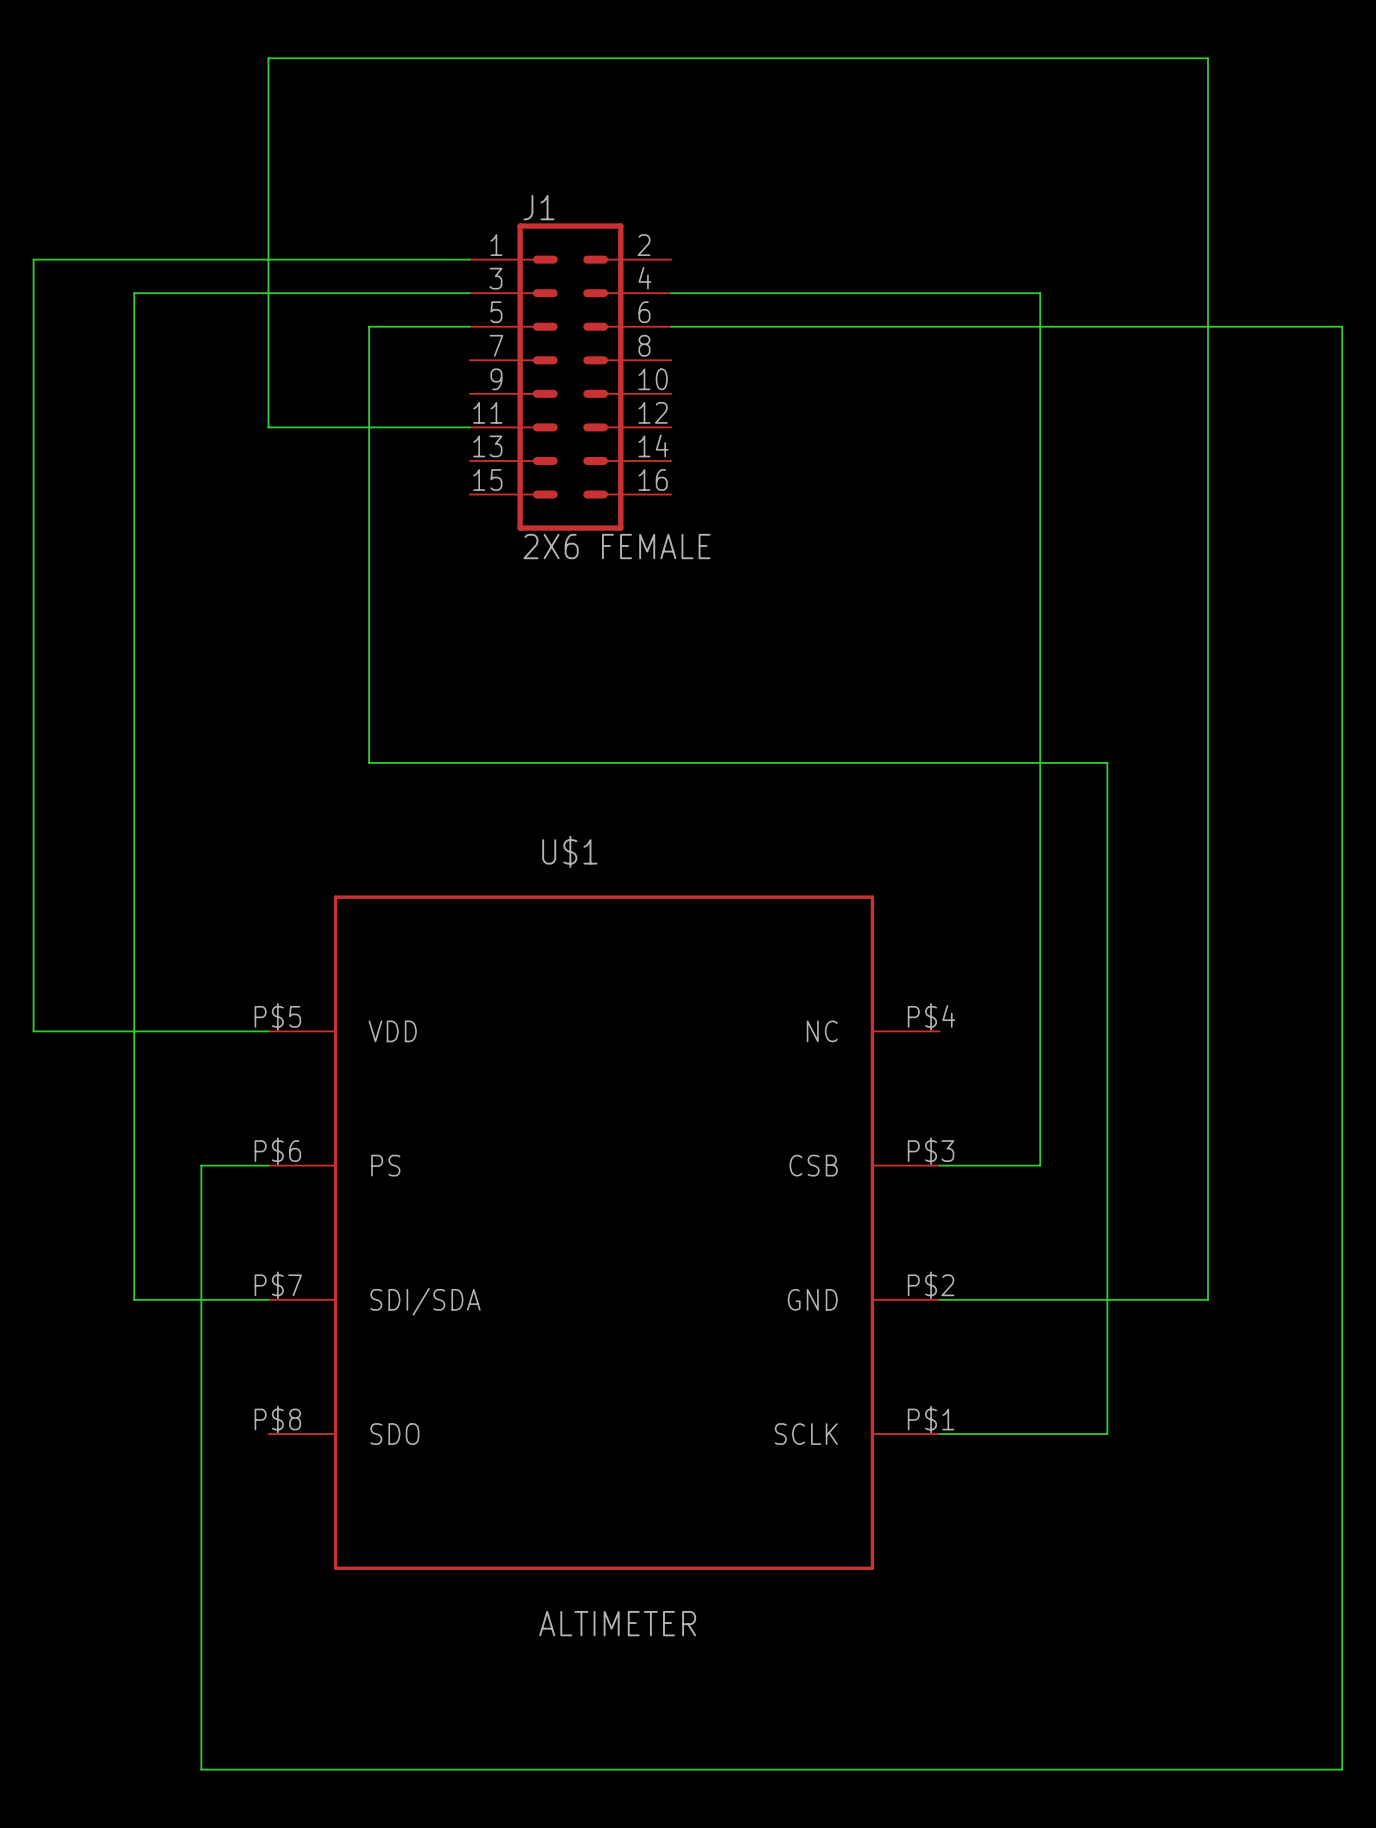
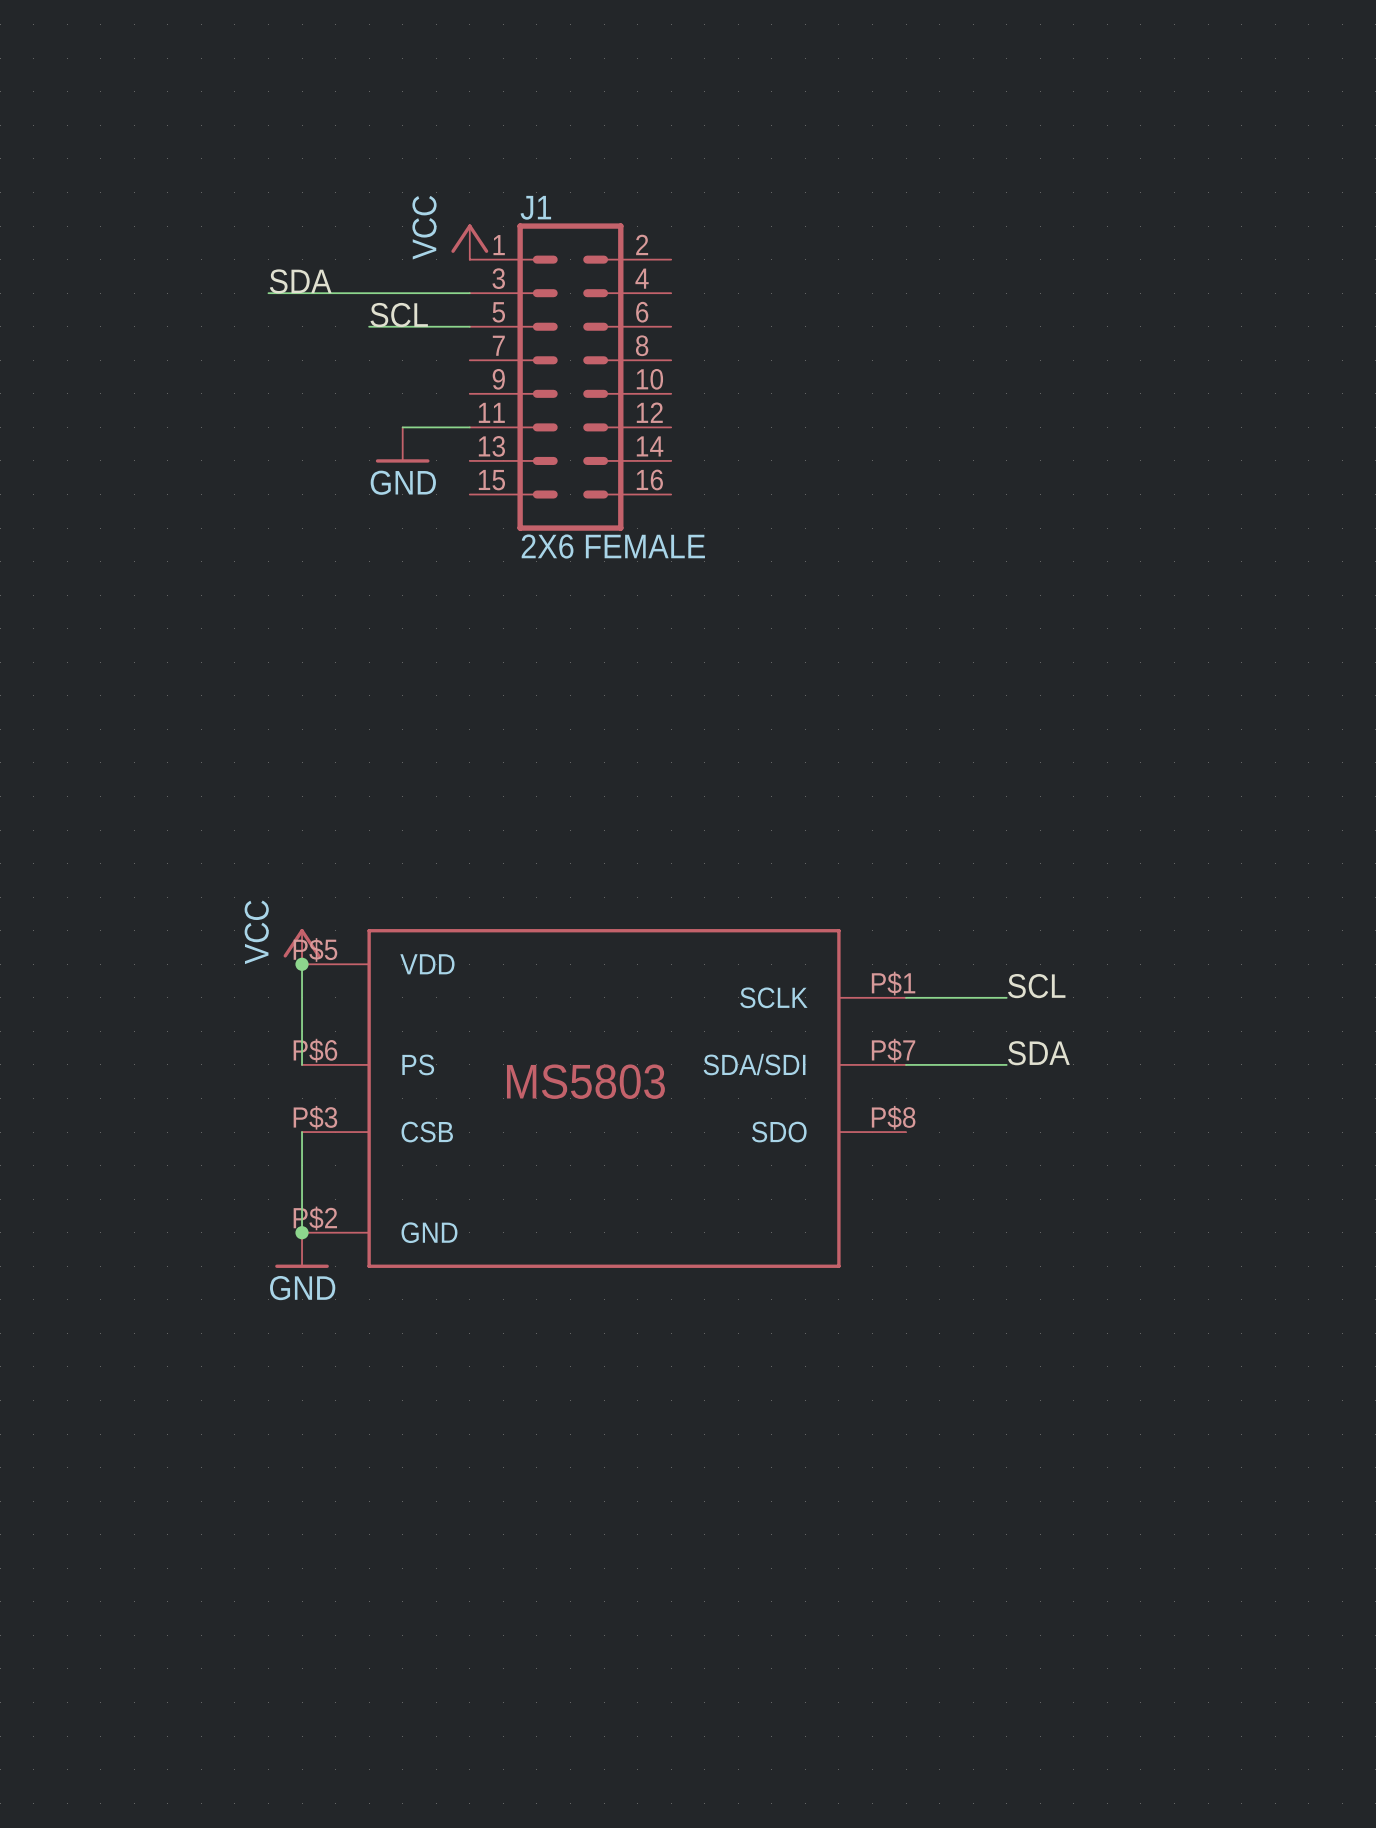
power symbol: none -> VCC (469, 242)
wire: (469, 259) (33, 259) (33, 1031) (268, 1031) -> none
label: none -> SDA (300, 281)
wire: (268, 293) (134, 293) (134, 1299) (268, 1299) -> none
wire: (671, 293) (1040, 293) (1040, 1165) (939, 1165) -> none
label: none -> SCL (399, 314)
wire: (369, 326) (369, 762) (1107, 762) (1107, 1434) (939, 1434) -> none
wire: (671, 326) (1342, 326) (1342, 1769) (201, 1769) (201, 1165) (268, 1165) -> none
wire: (402, 427) (268, 427) (268, 58) (1208, 58) (1208, 1299) (939, 1299) -> none
power symbol: none -> GND (402, 445)
power symbol: none -> VCC (302, 946)
wire: none -> (302, 964) (302, 1064)
junction: none -> (302, 964)
label: none -> SCL (1036, 986)
wire: none -> (906, 997) (1006, 997)
label: none -> SDA (1038, 1053)
wire: none -> (906, 1064) (1006, 1064)
part: none -> (604, 1098)
wire: none -> (302, 1132) (302, 1232)
junction: none -> (302, 1232)
U$1: ALTIMETER (604, 1232) -> none
power symbol: none -> GND (302, 1250)

